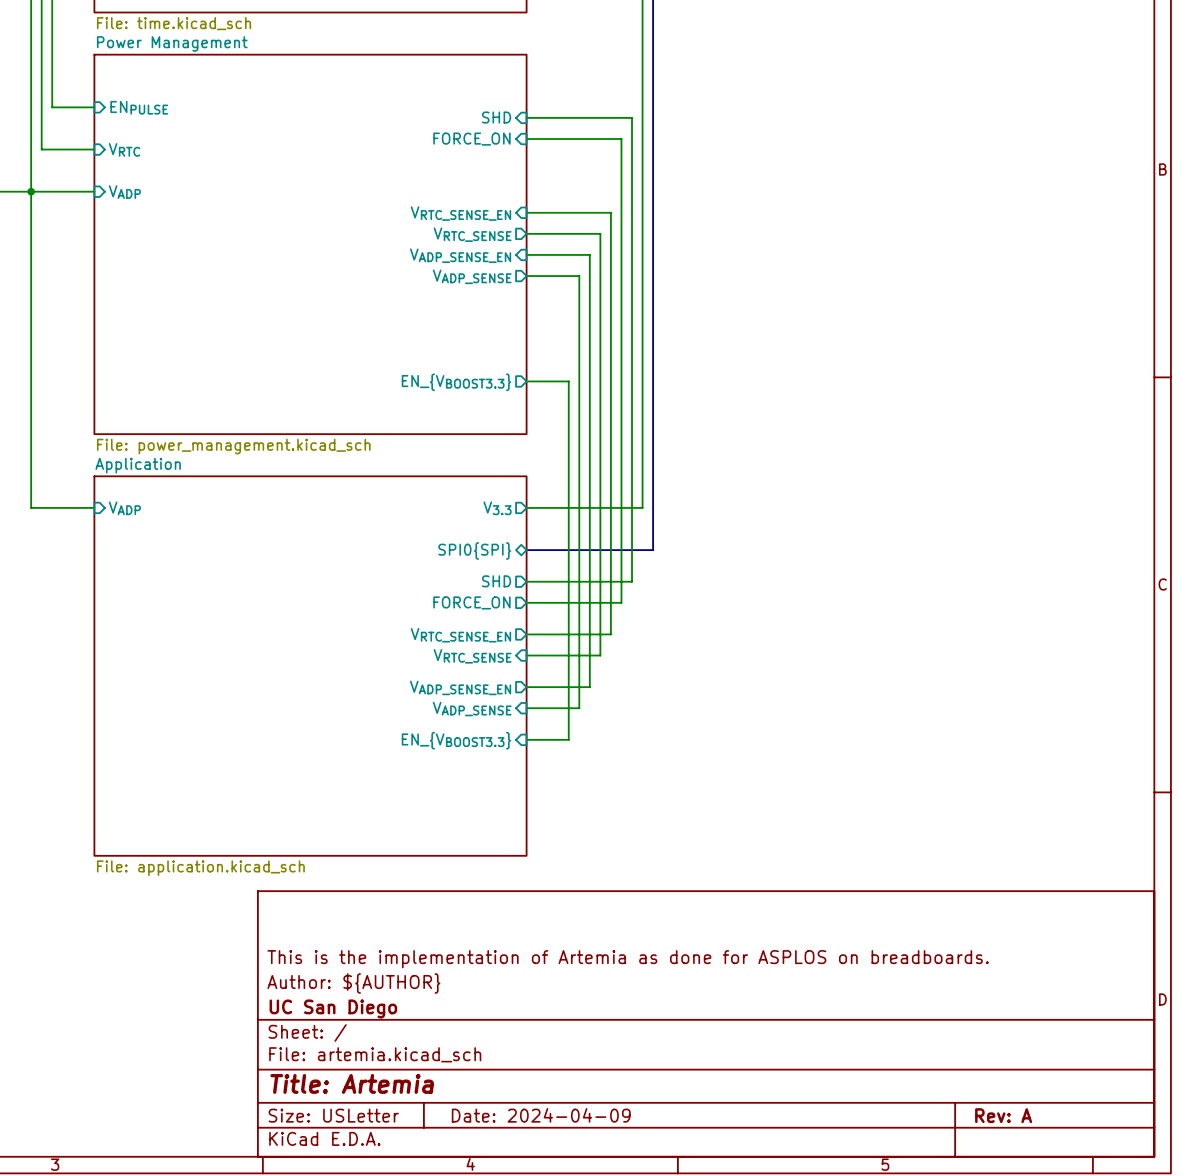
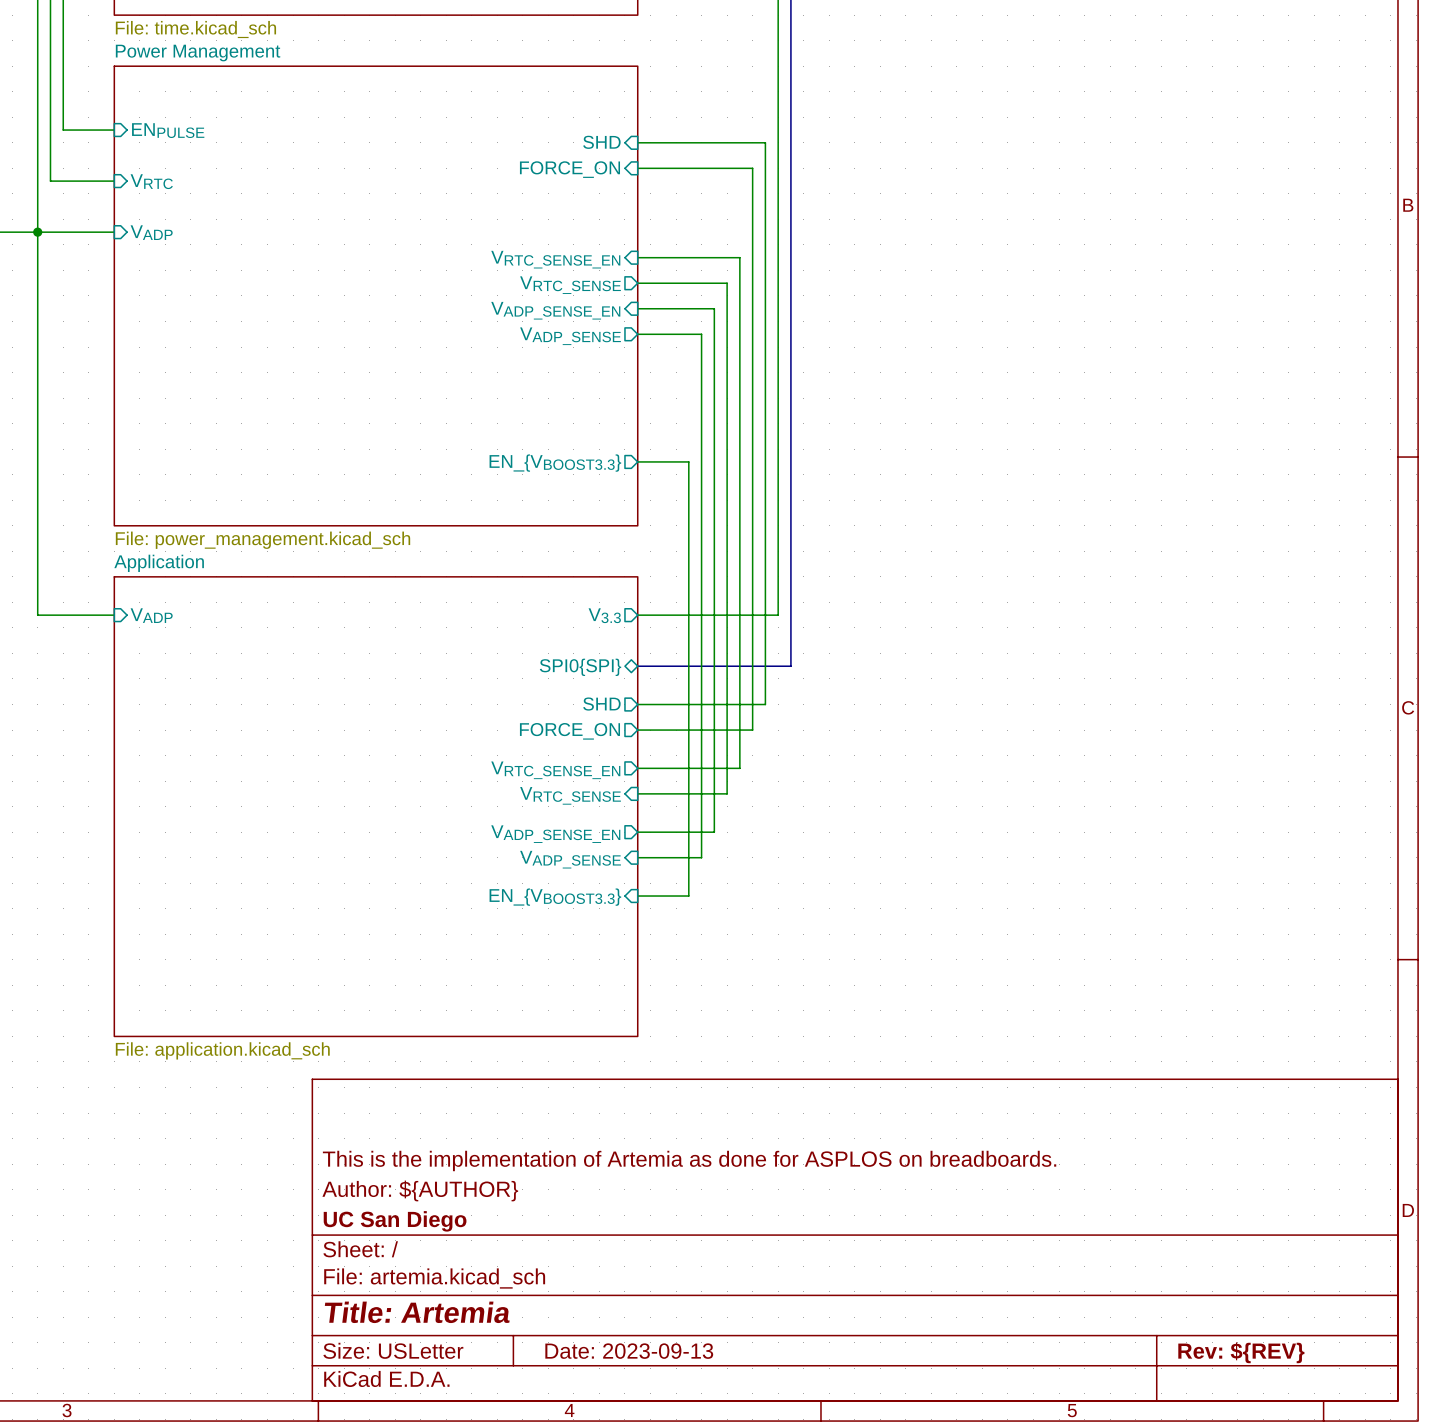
title block: Date: 2024-04-09 (541, 1115) -> Date: 2023-09-13 (629, 1351)
title block: Rev: A (1003, 1115) -> Rev: ${REV} (1241, 1352)

